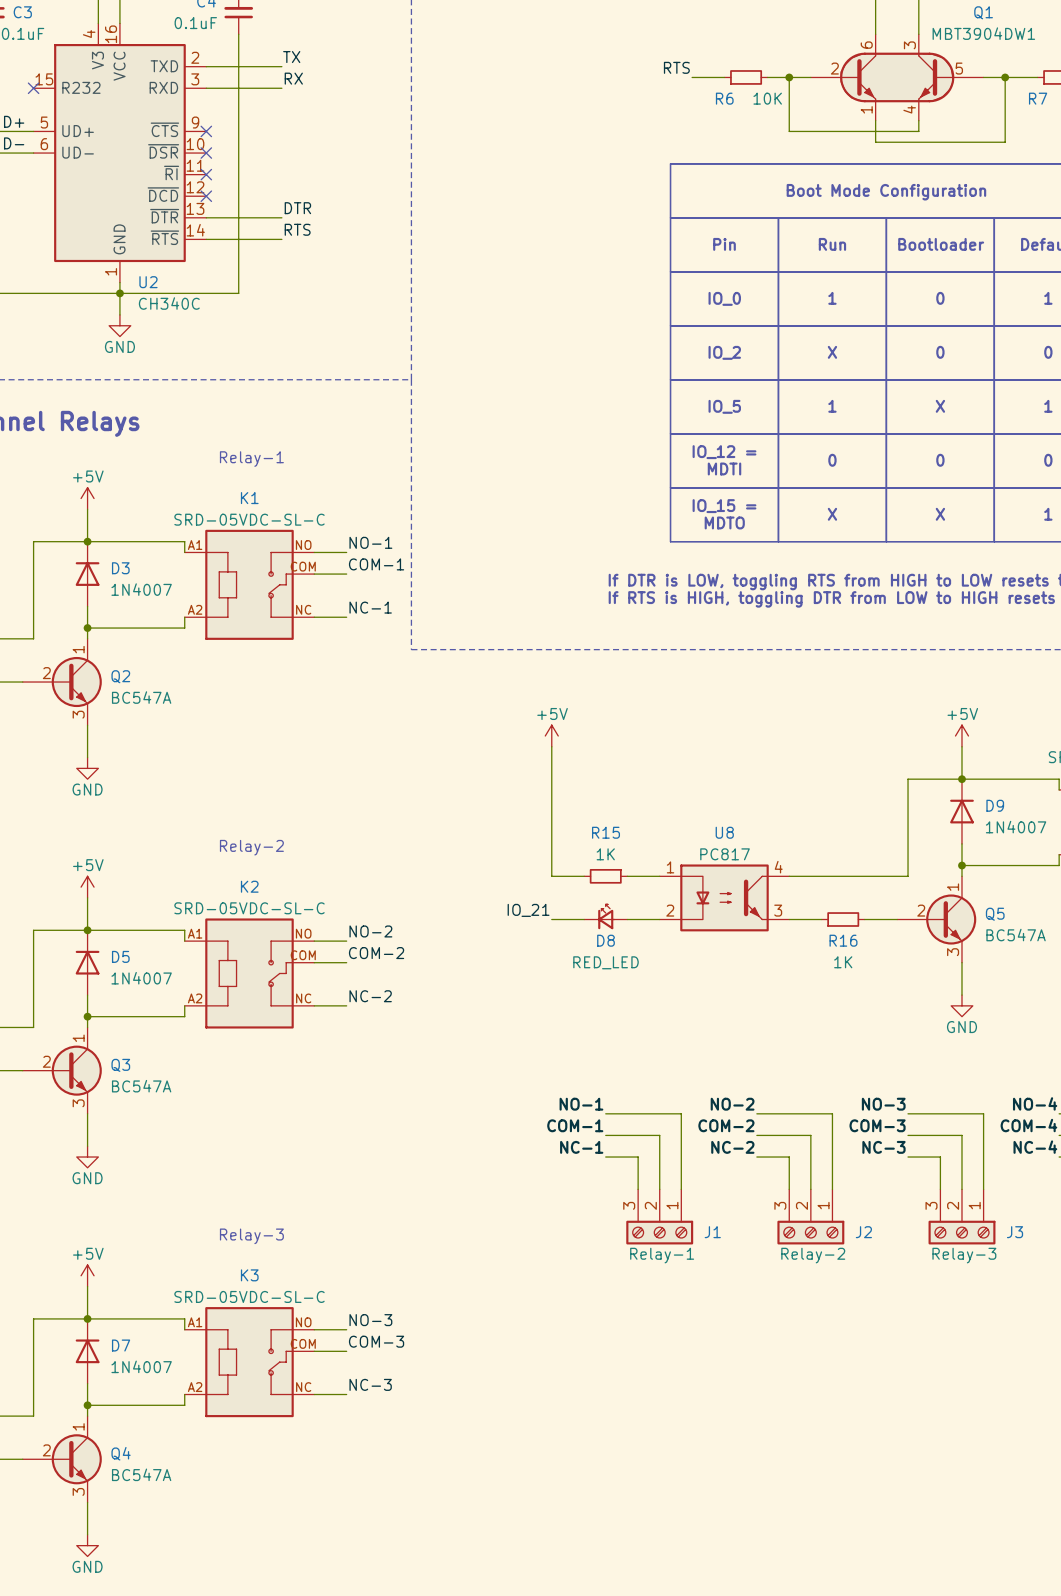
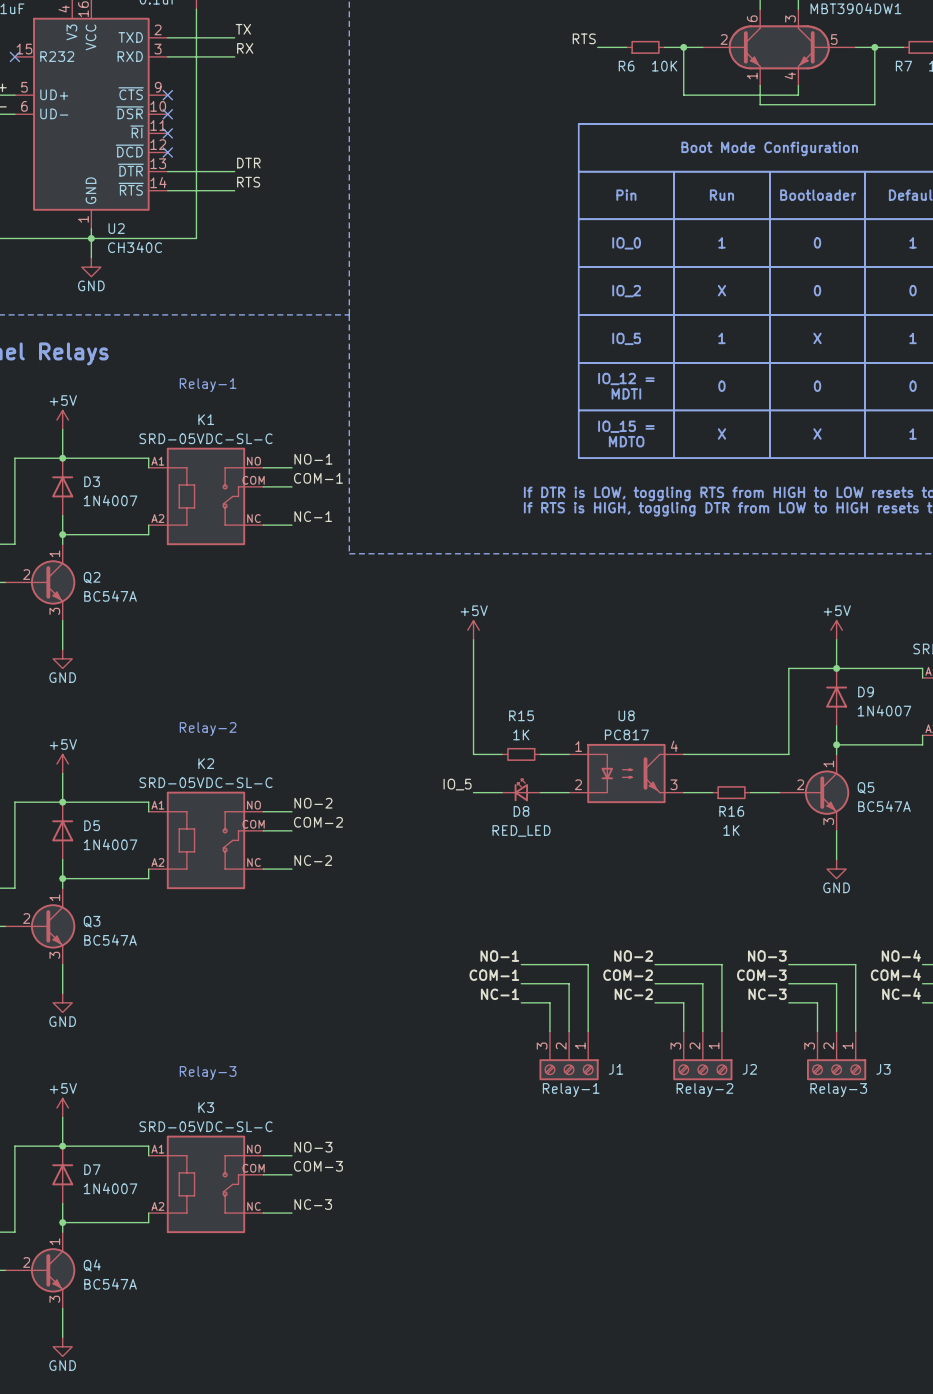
label: IO_21 (528, 910) -> IO_5 (457, 784)

